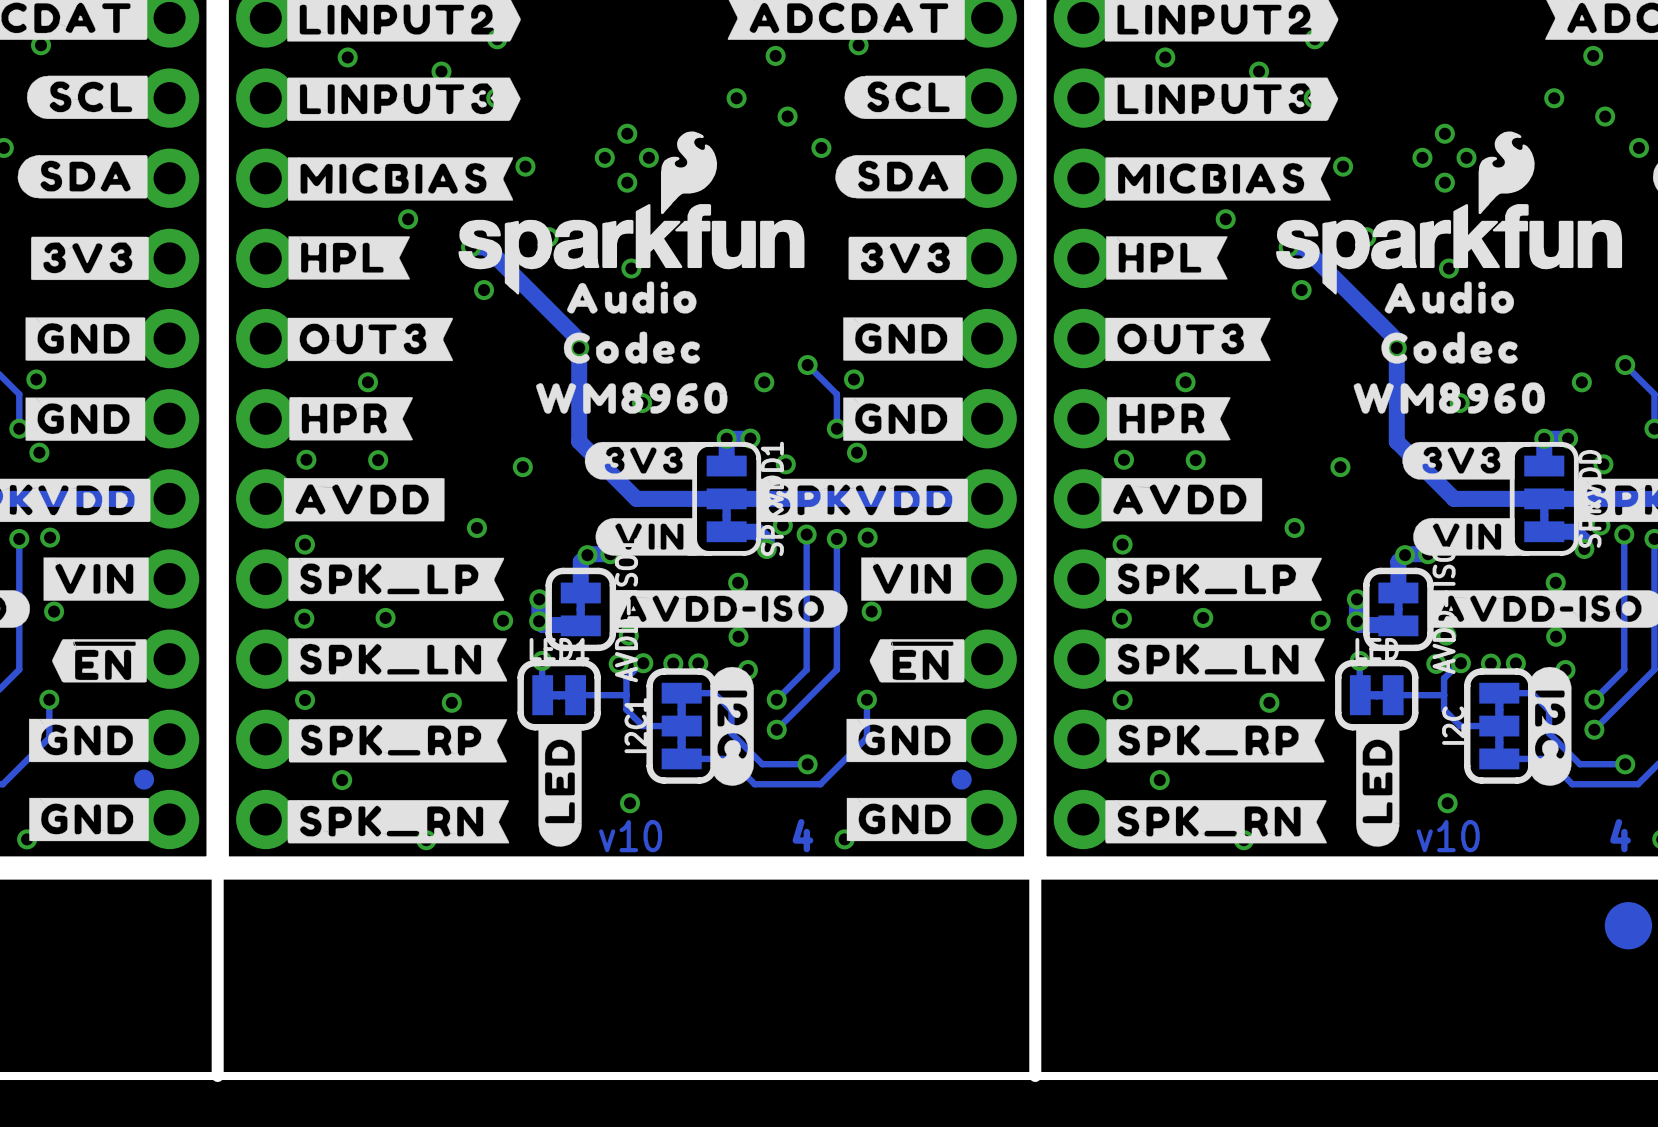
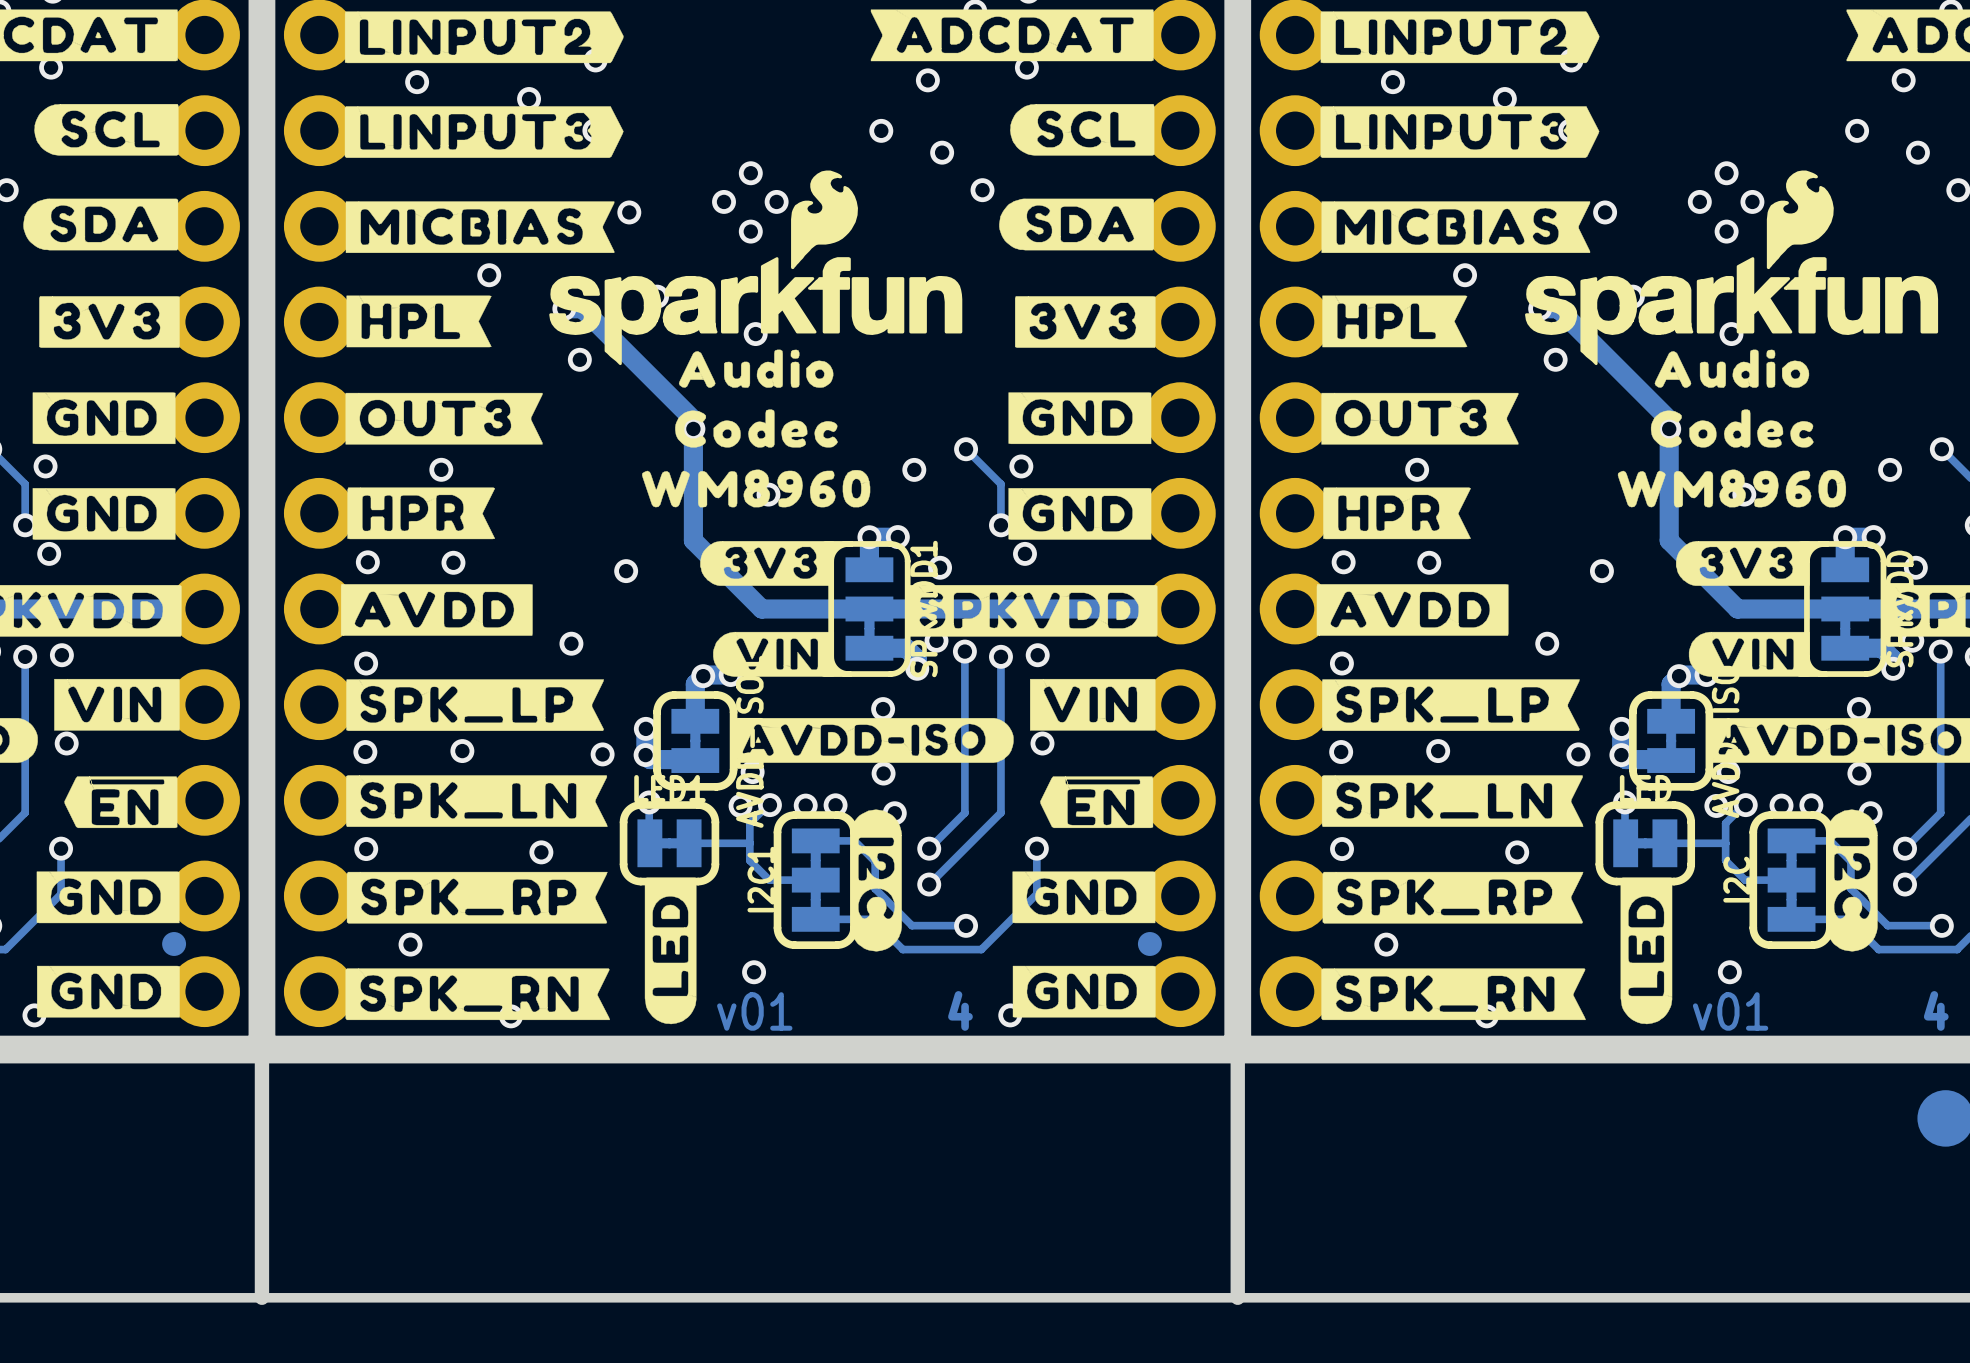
text: v10 (630, 836) -> v01 (754, 1011)
text: v10 (1448, 836) -> v01 (1730, 1011)

